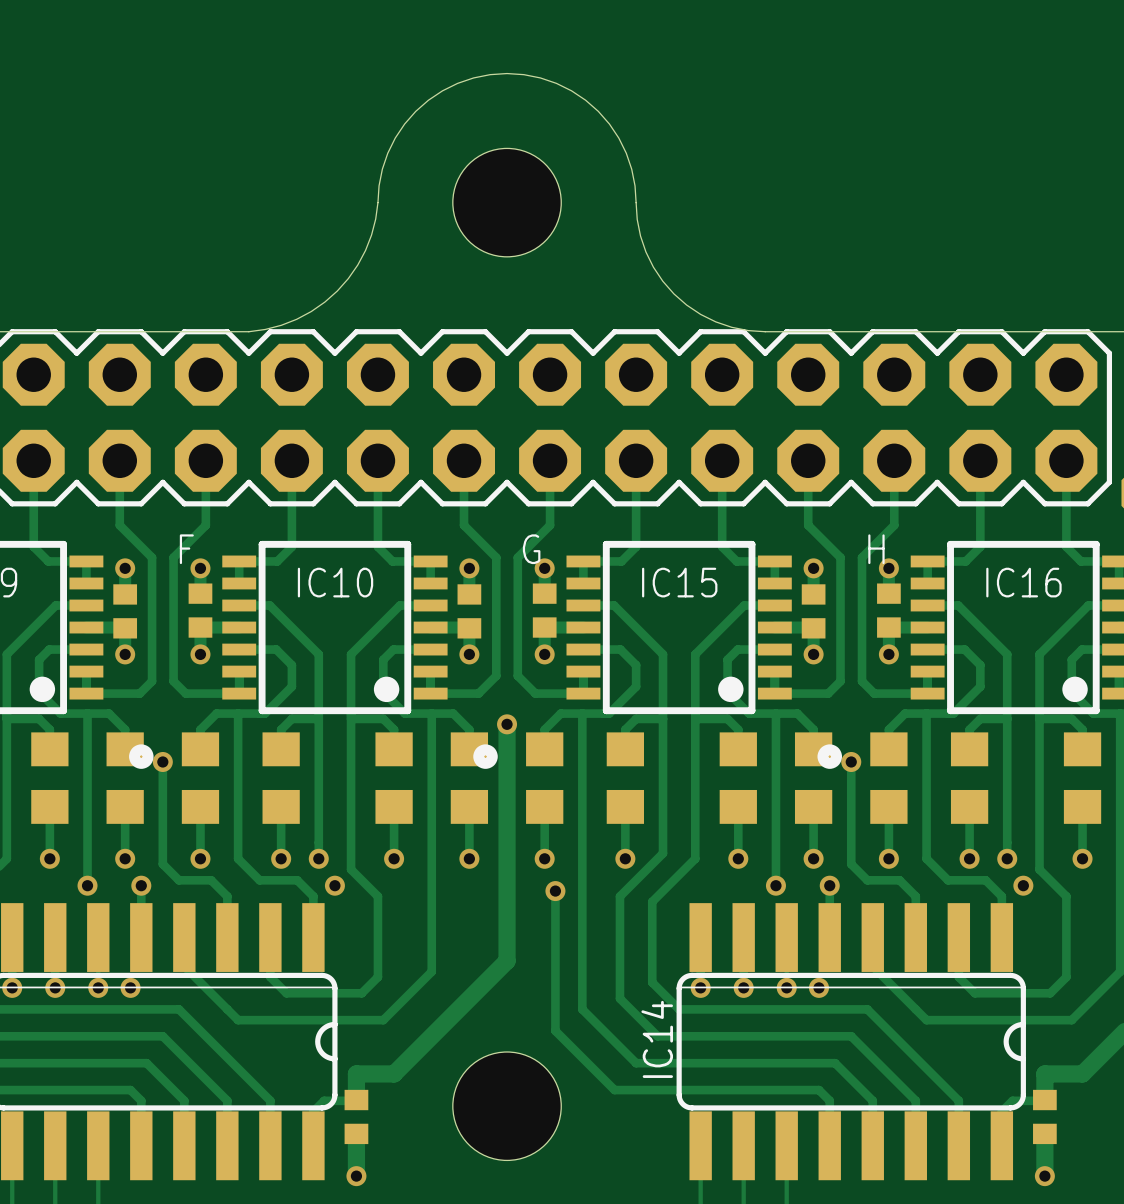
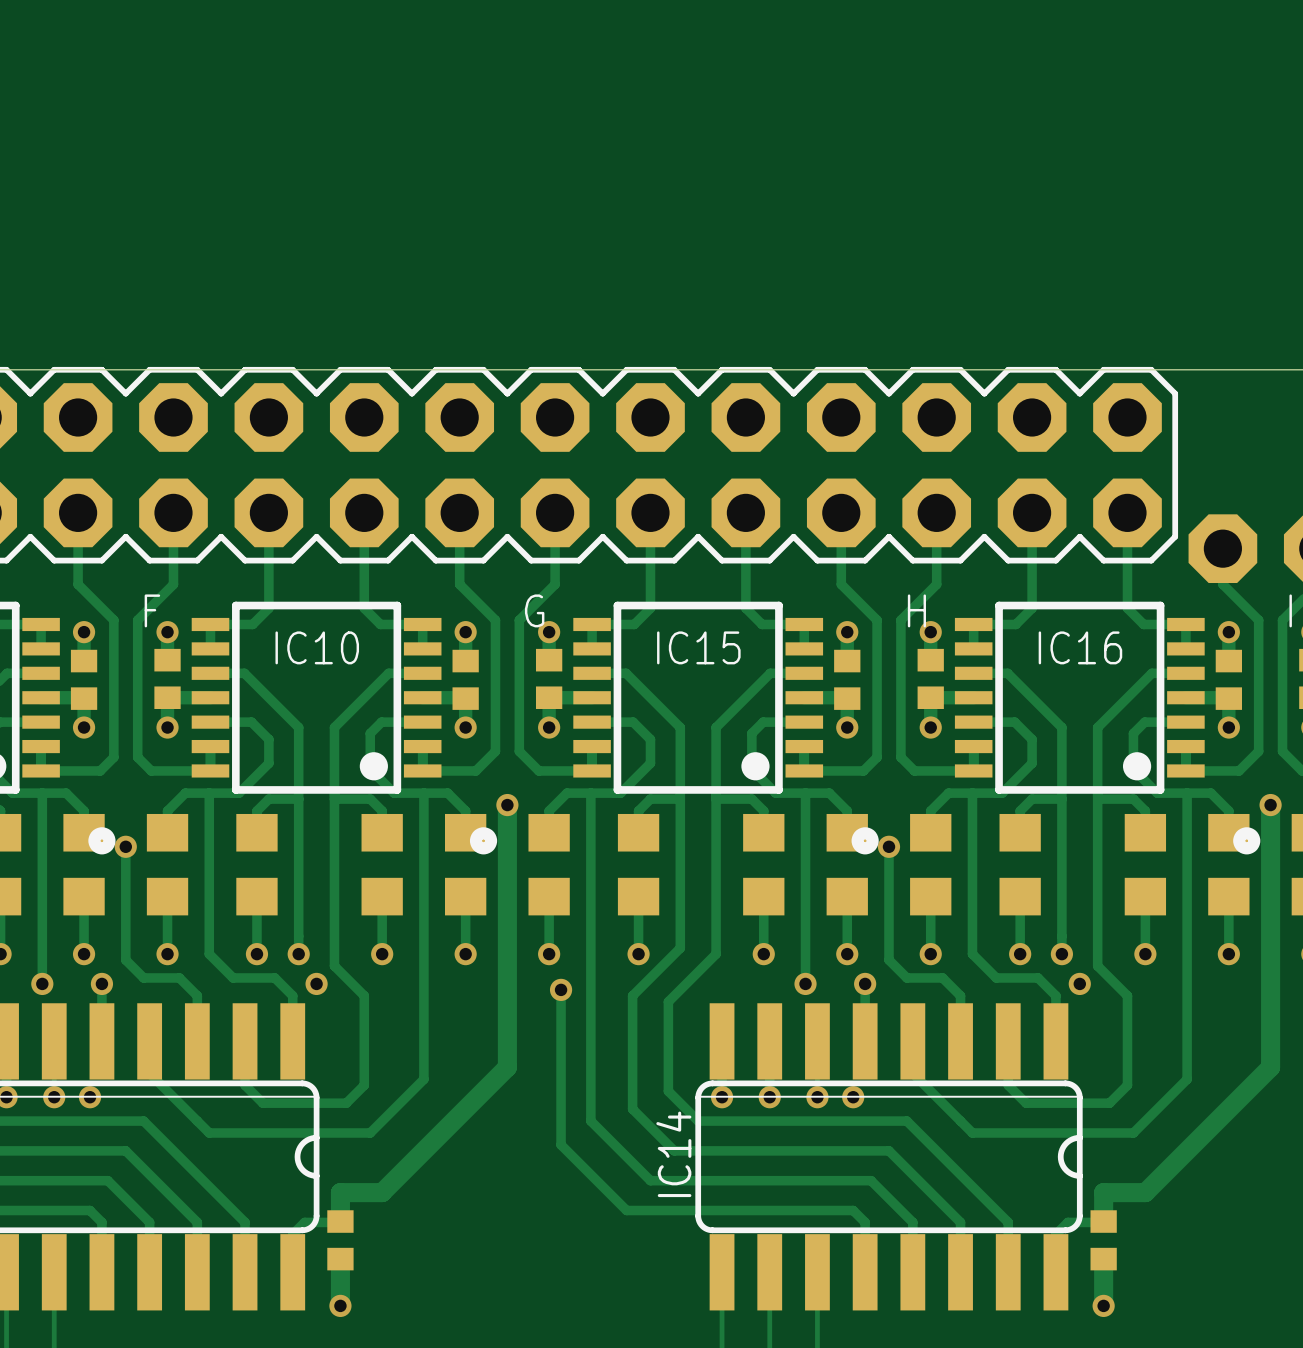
hole: (507, 202) -> none
board edge: (248, 331) (281, 325) (296, 319) (324, 302) (348, 278) (365, 250) (371, 235) (375, 219) (379, 185) (387, 153) (395, 138) (415, 111) (442, 90) (457, 83) (473, 77) (507, 73) (540, 77) (556, 83) (571, 90) (598, 111) (618, 138) (626, 153) (635, 185) (640, 236) (653, 267) (662, 281) (673, 293) (700, 314) (731, 327) (765, 331) -> (221, 369) (793, 369)
hole: (507, 1106) -> none

